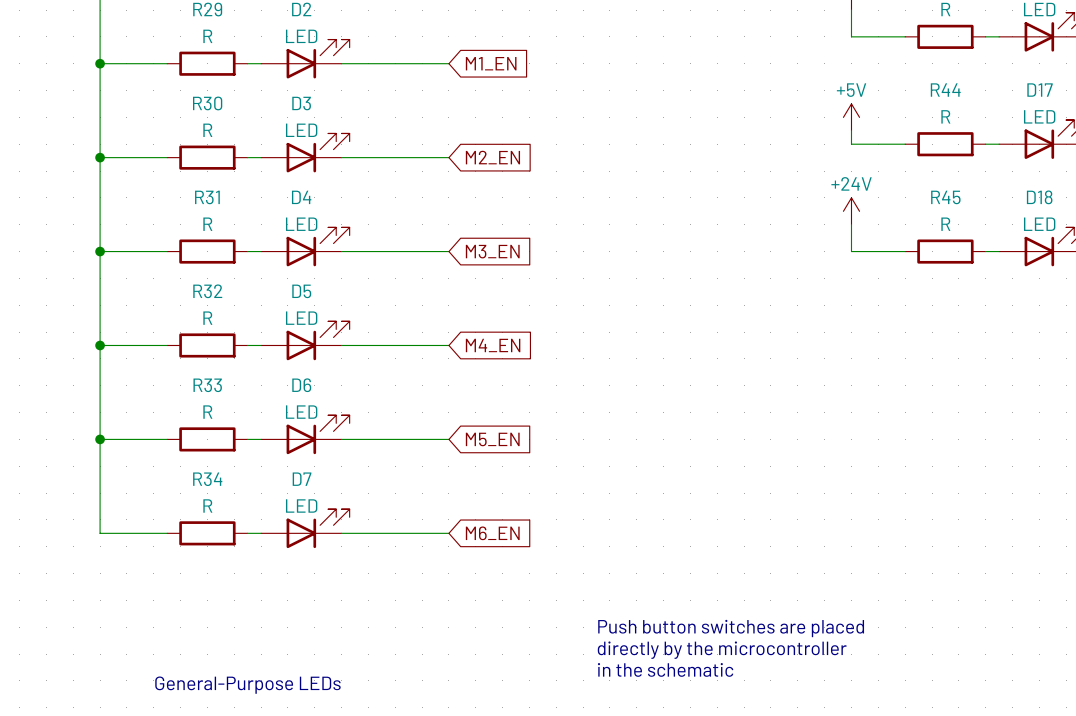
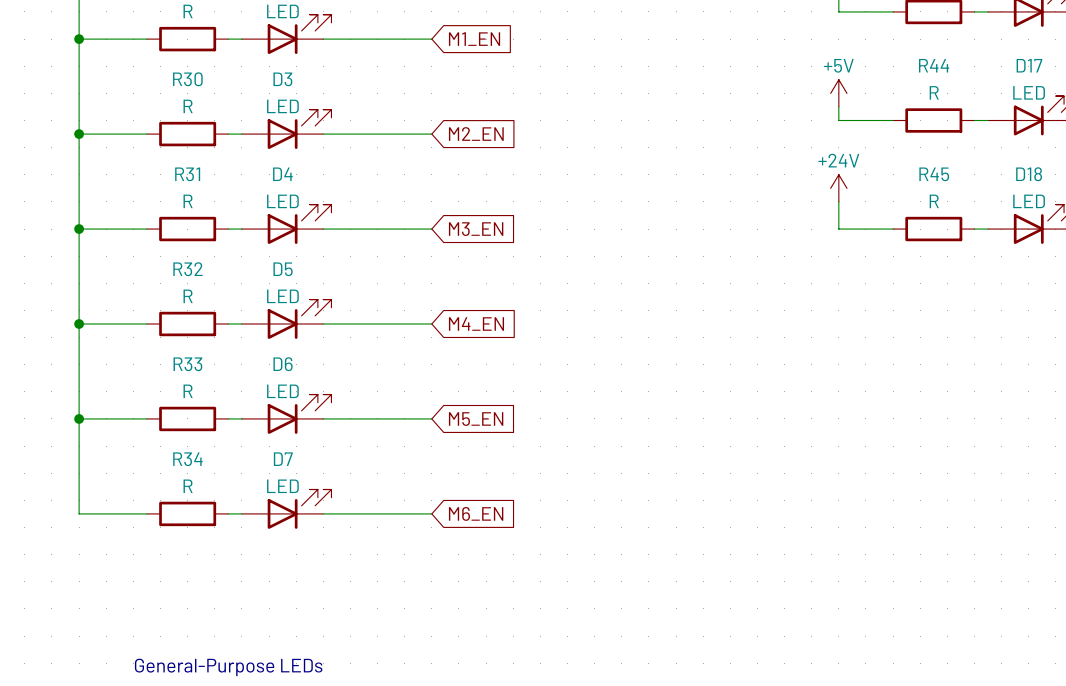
text: Push button switches are placed (731, 628) -> none
text: directly by the microcontroller (722, 650) -> none
text: in the schematic (665, 669) -> none

